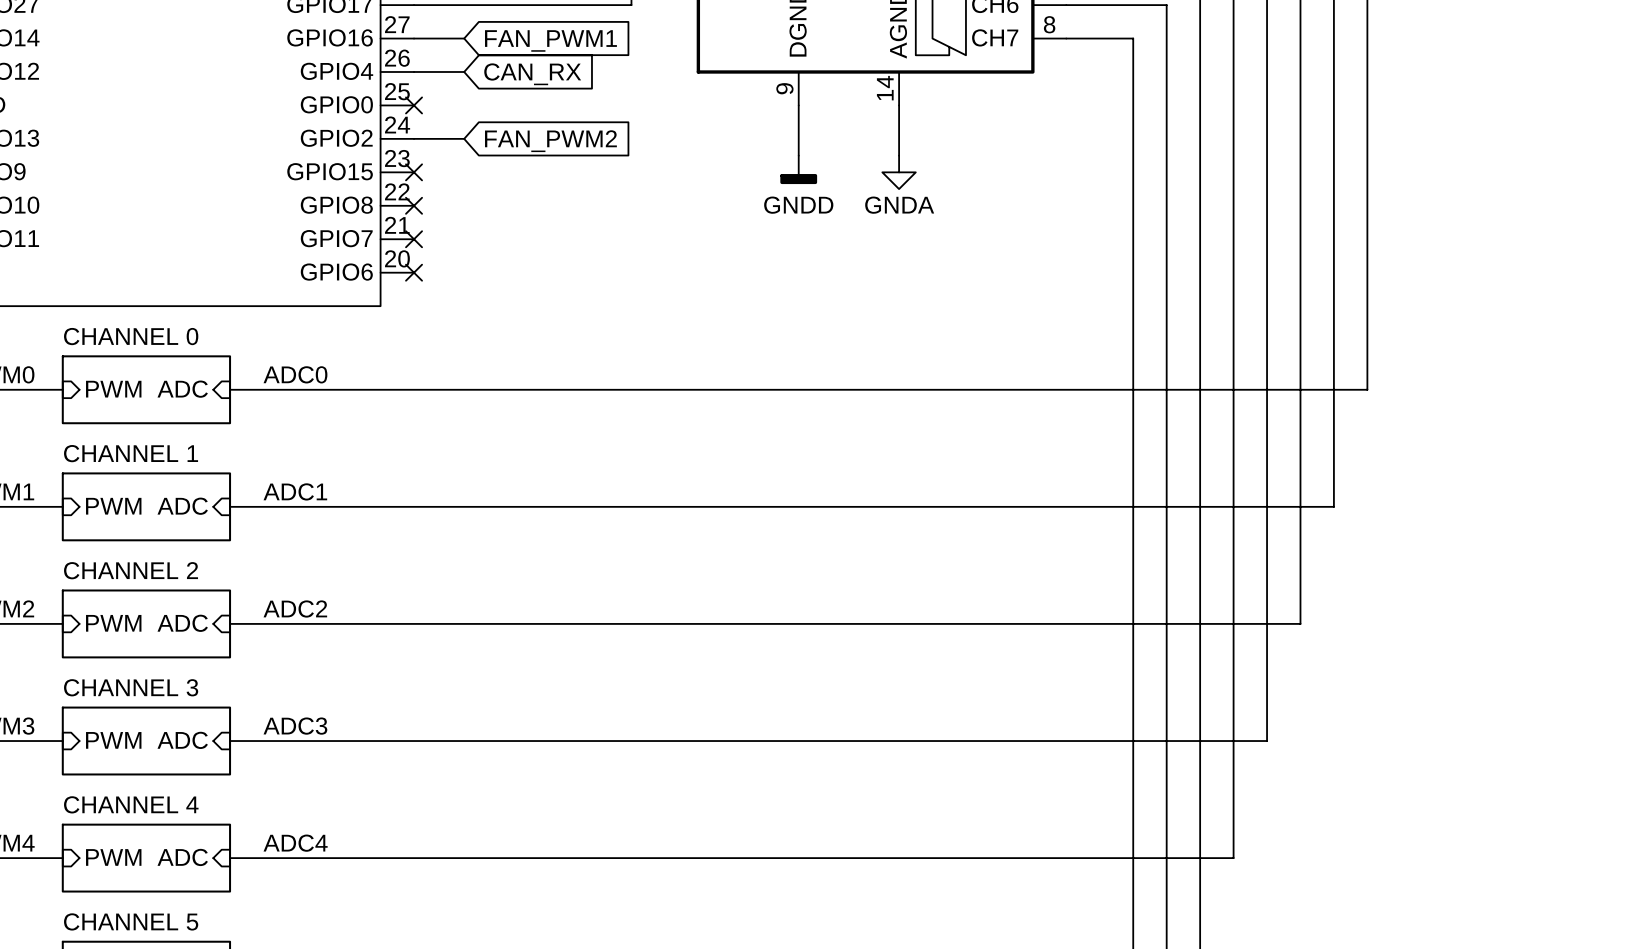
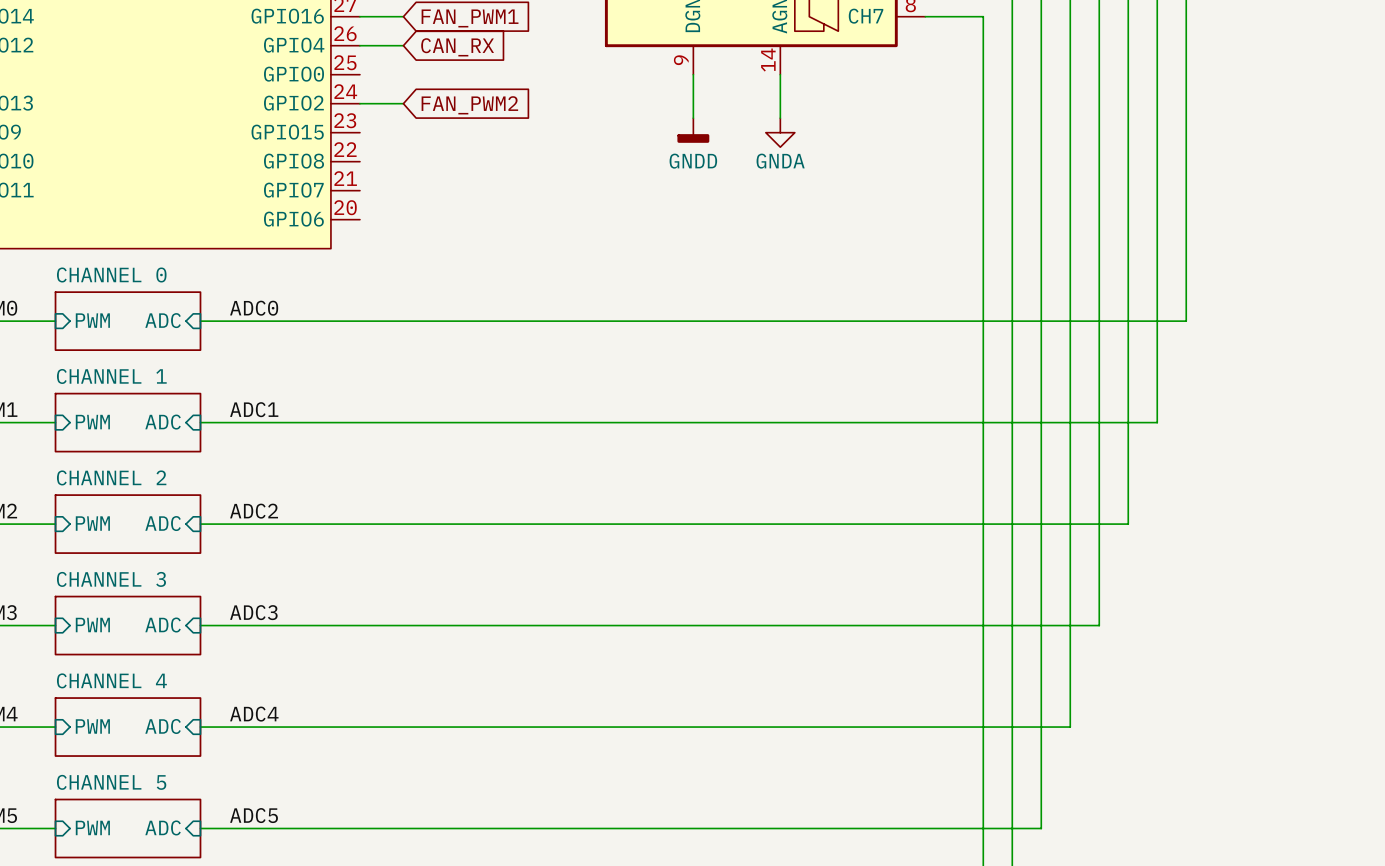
no-connect mark: (414, 105) -> none
no-connect mark: (414, 172) -> none
no-connect mark: (414, 205) -> none
no-connect mark: (414, 239) -> none
no-connect mark: (414, 272) -> none

